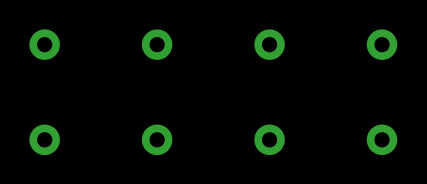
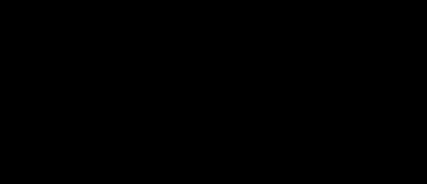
part: (44, 44) -> none
part: (157, 44) -> none
part: (269, 44) -> none
part: (382, 44) -> none
part: (44, 139) -> none
part: (157, 139) -> none
part: (269, 139) -> none
part: (382, 139) -> none

